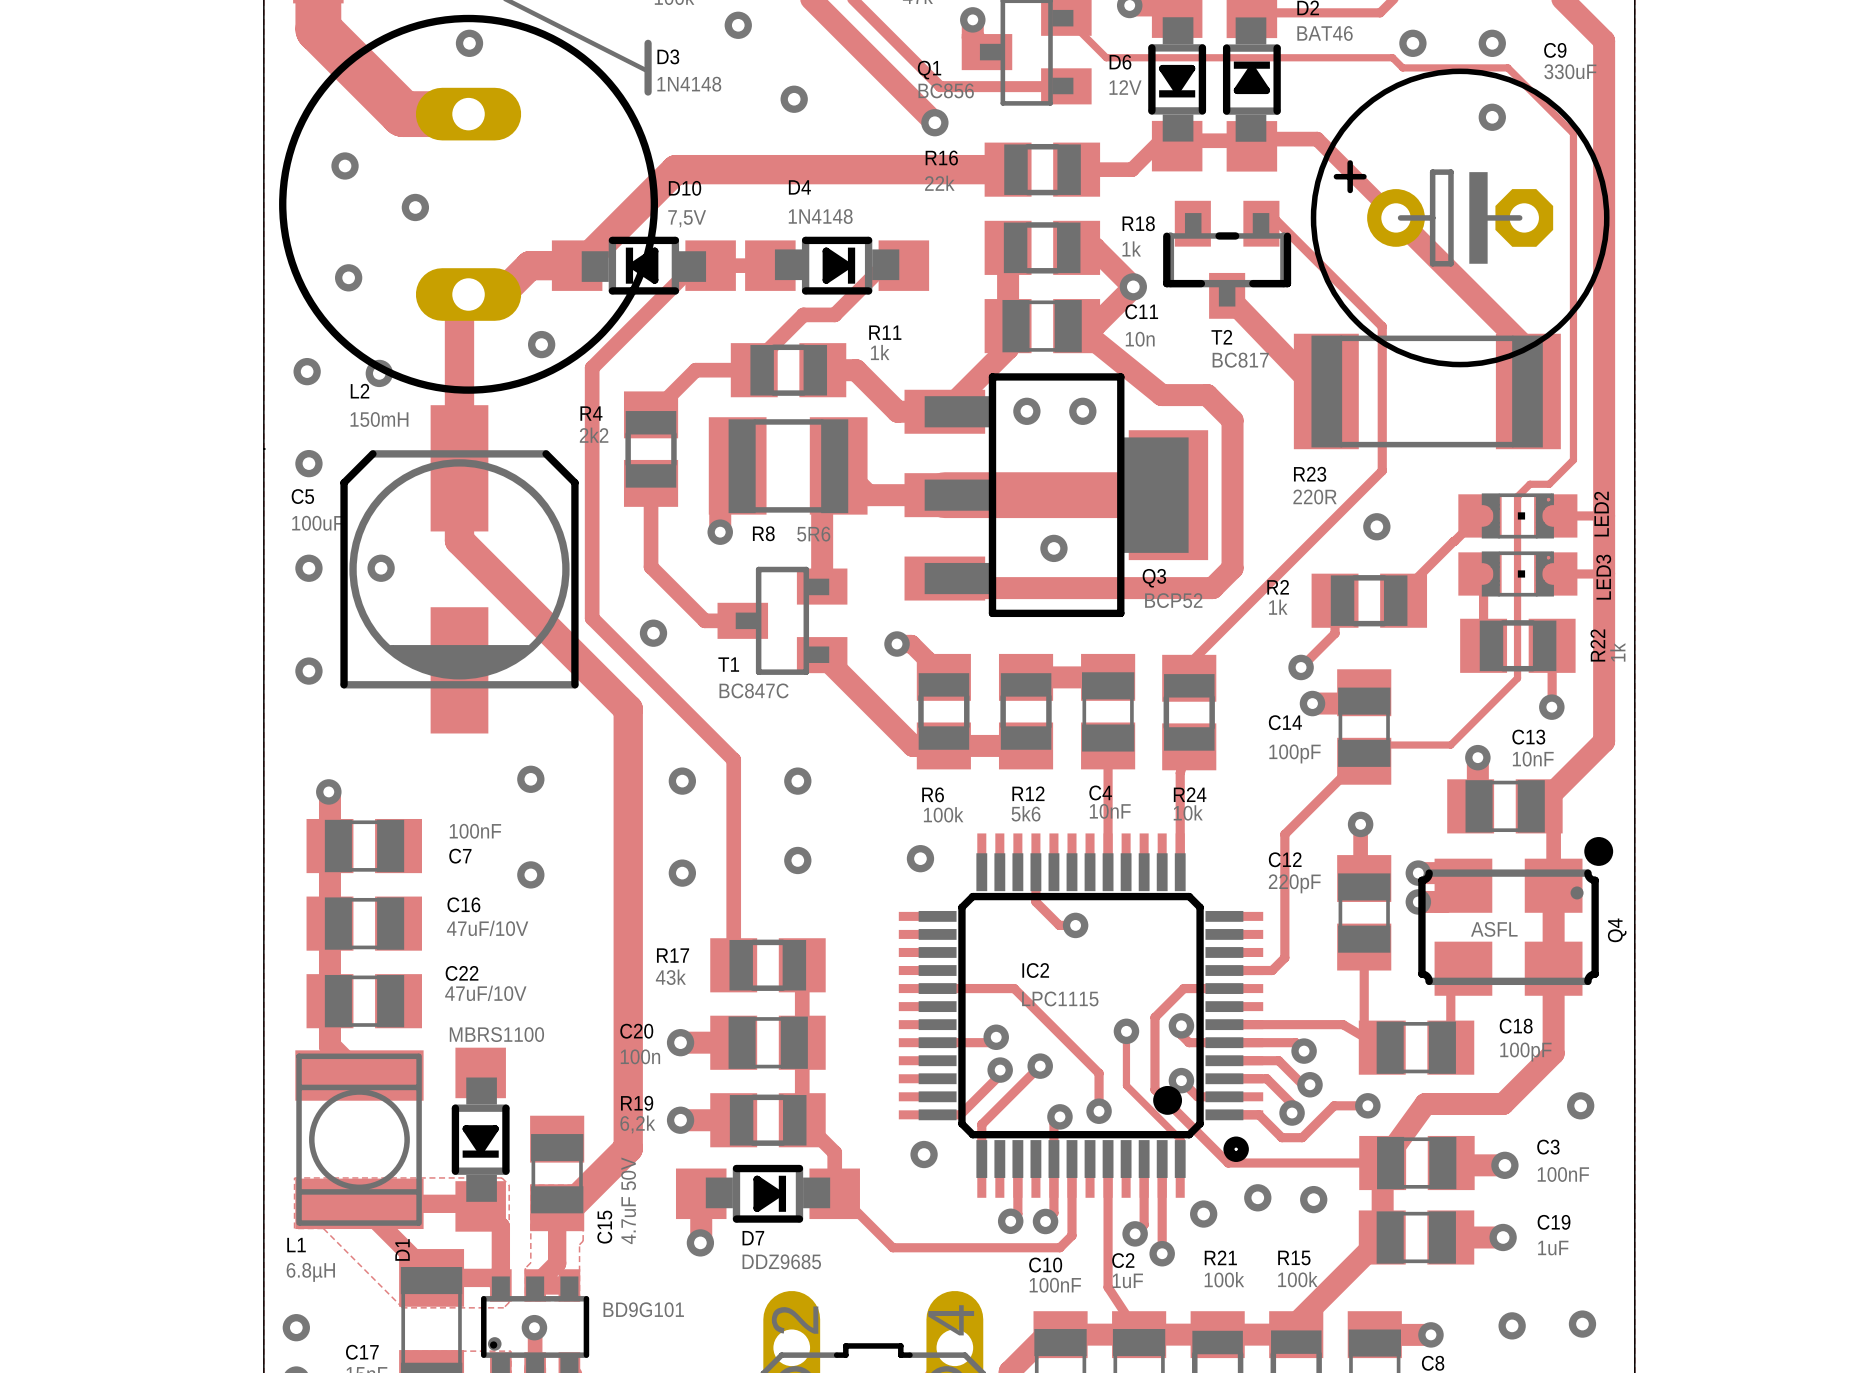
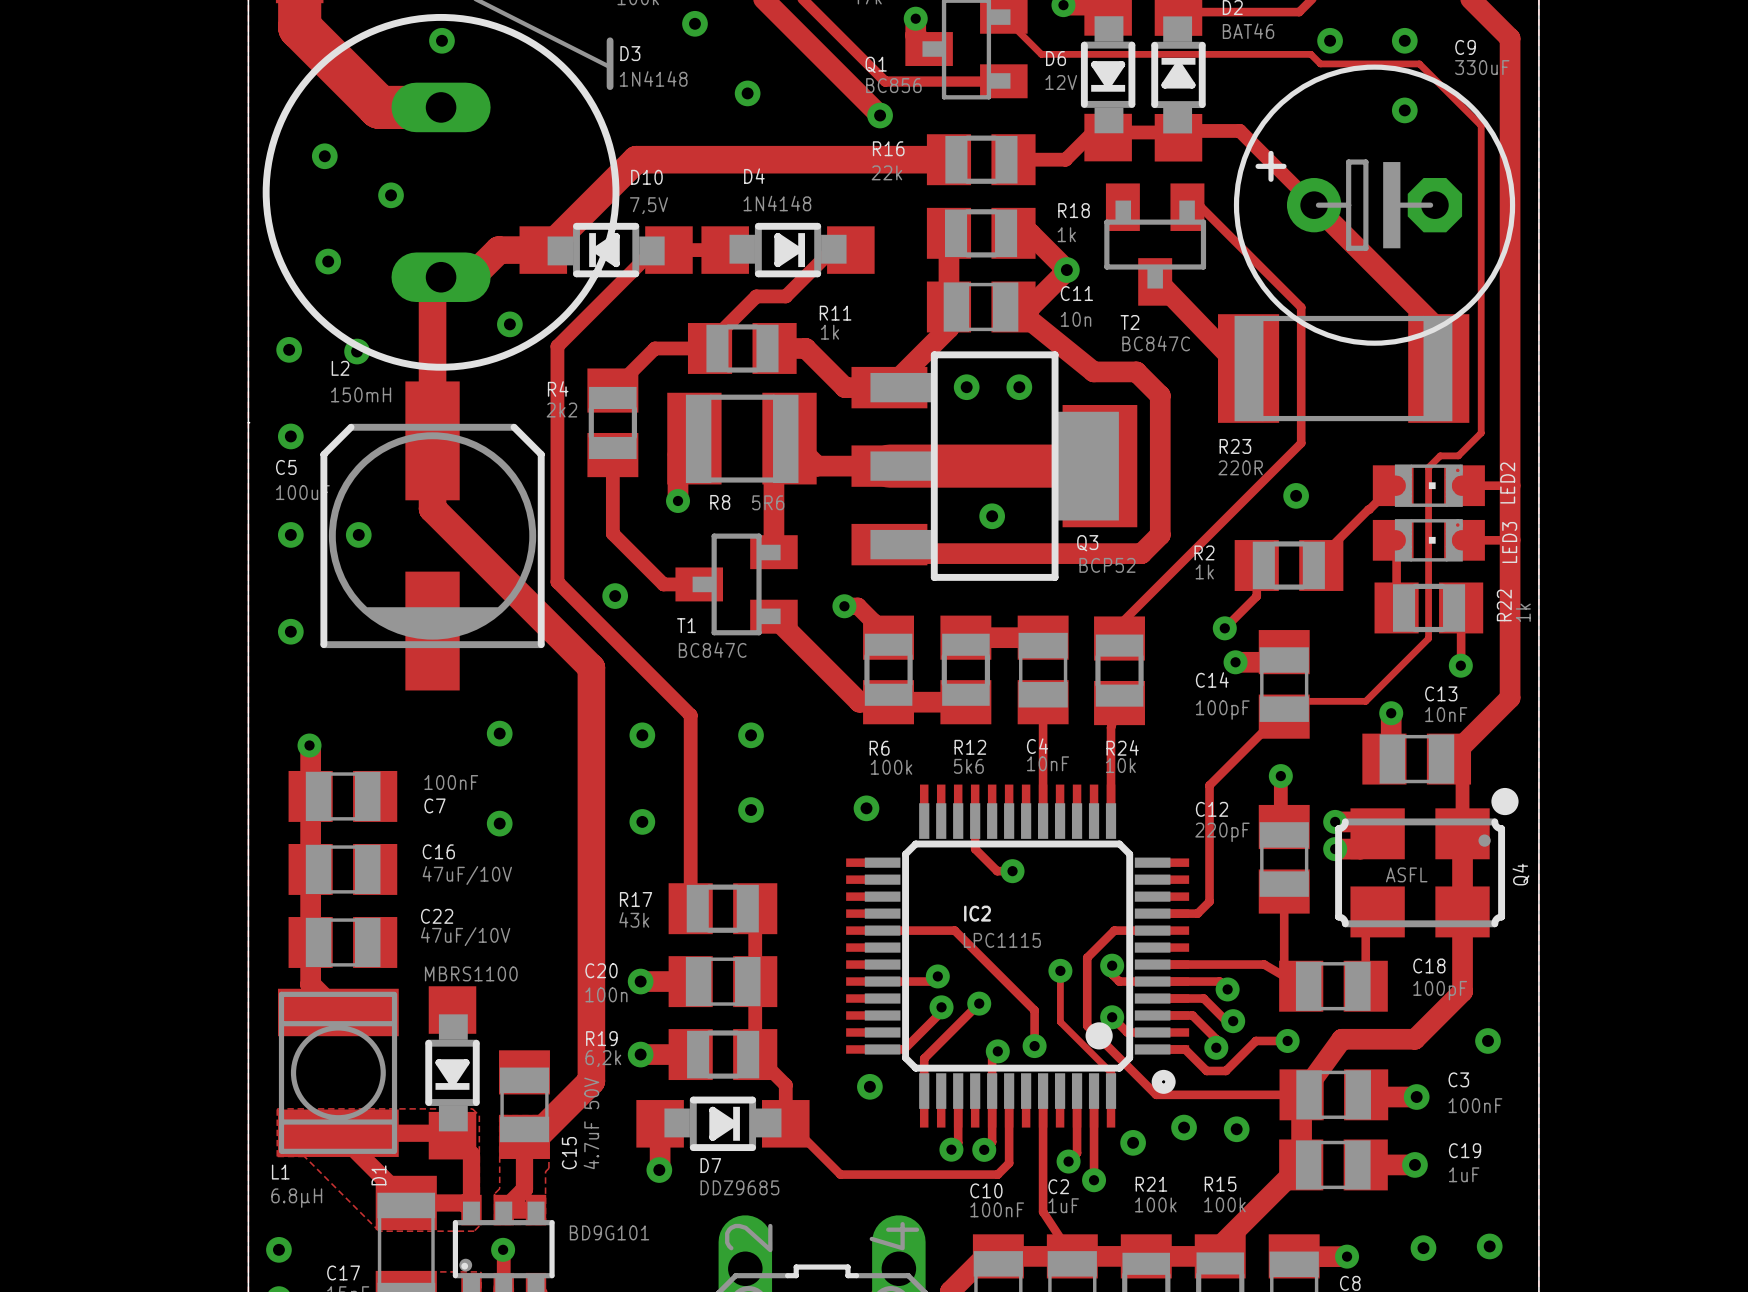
T2 footprint: [1163, 200, 1292, 319] -> [1104, 183, 1207, 306]
T2 value: BC817 (1240, 360) -> BC847C (1156, 343)

